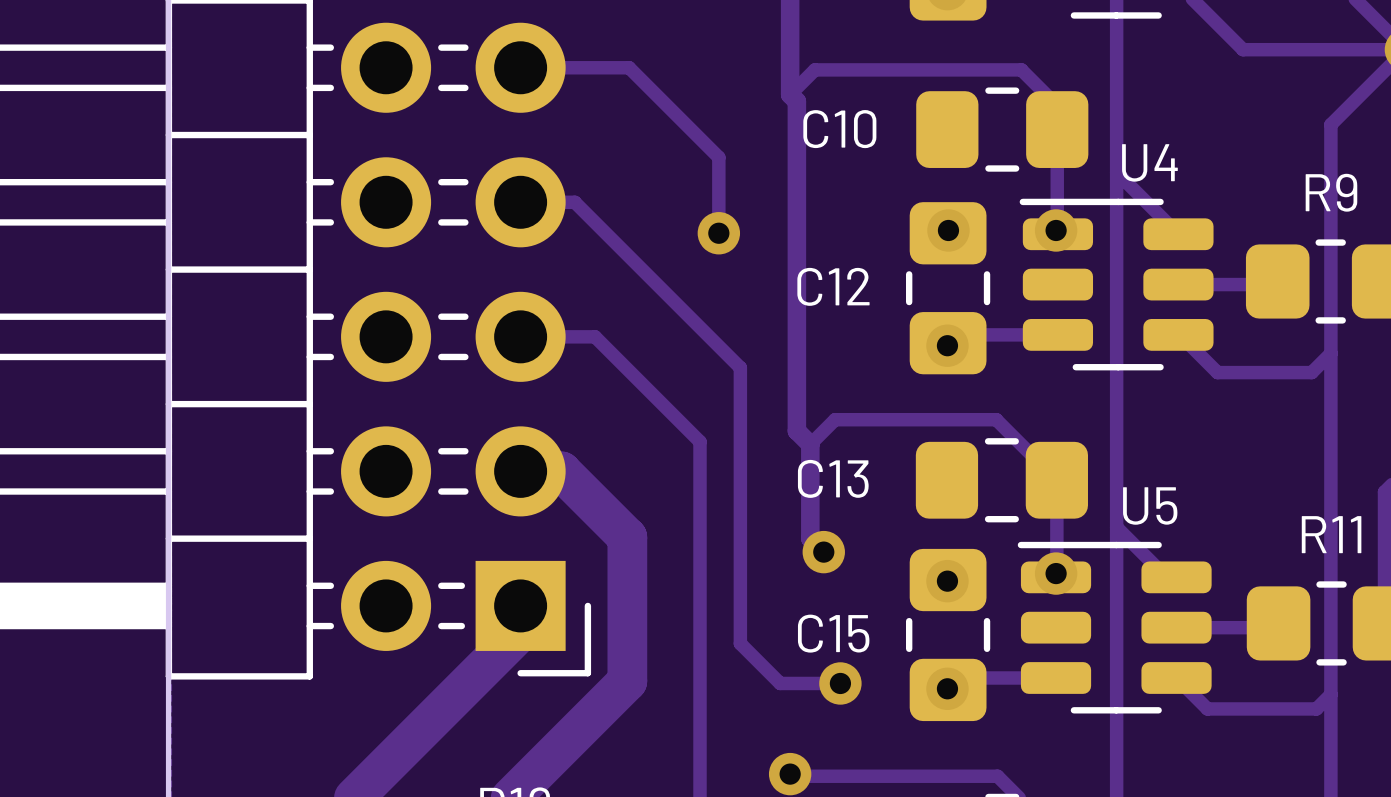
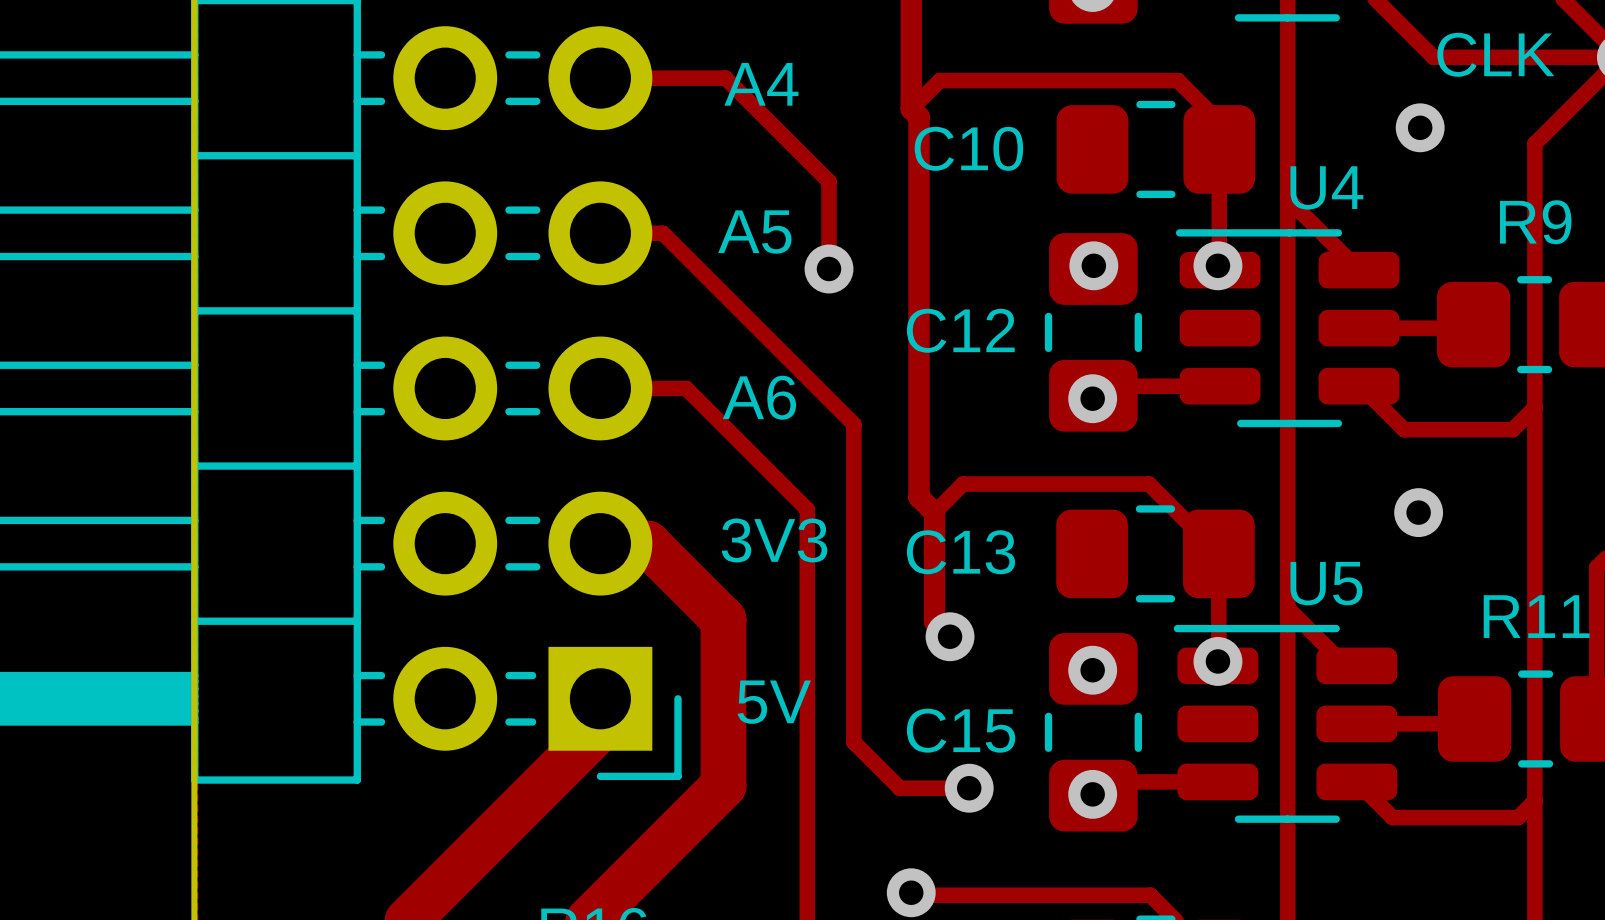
text: none -> CLK (1495, 54)
text: none -> A4 (761, 84)
via: none -> (1420, 127)
text: none -> A5 (754, 232)
text: none -> A6 (759, 397)
via: none -> (1418, 512)
text: none -> 3V3 (774, 540)
text: none -> 5V (774, 702)

